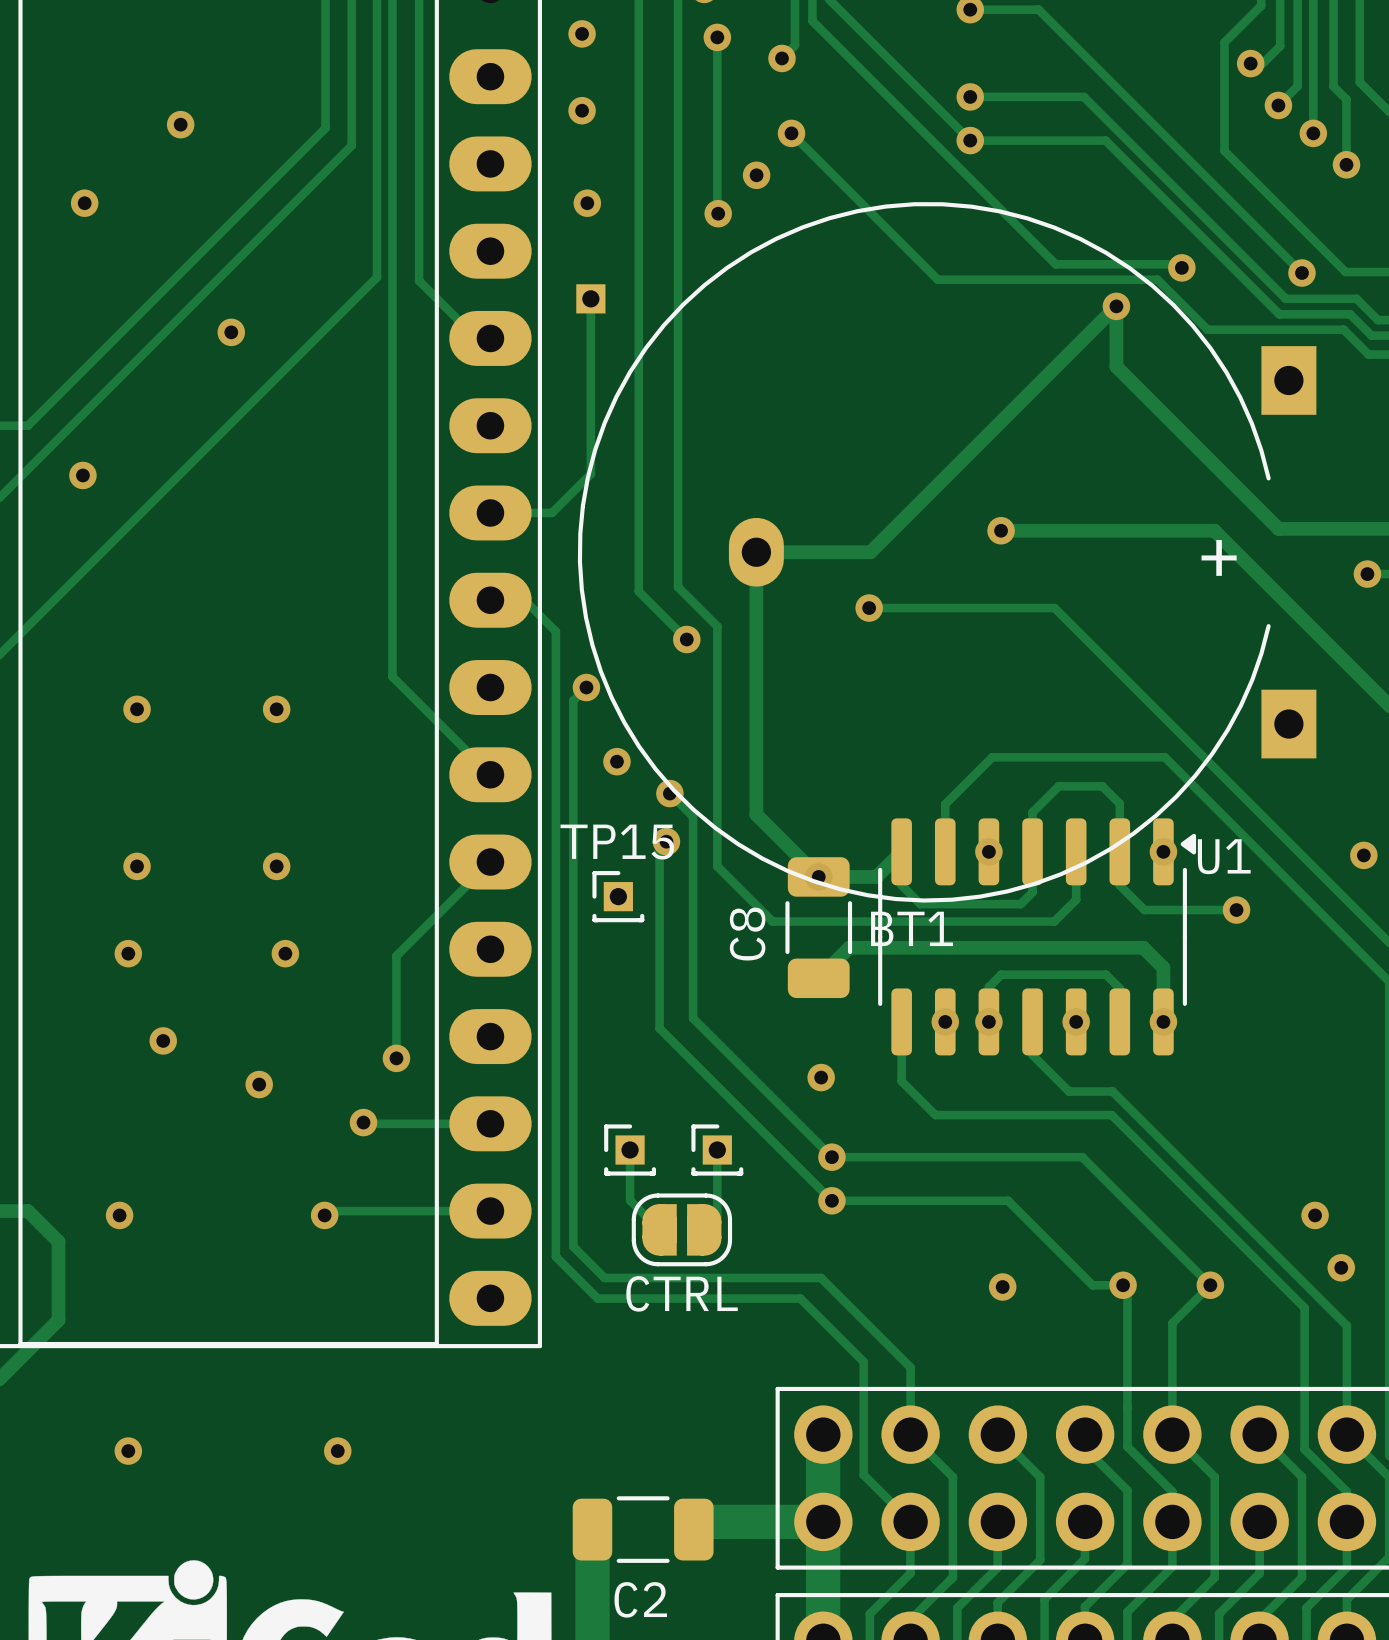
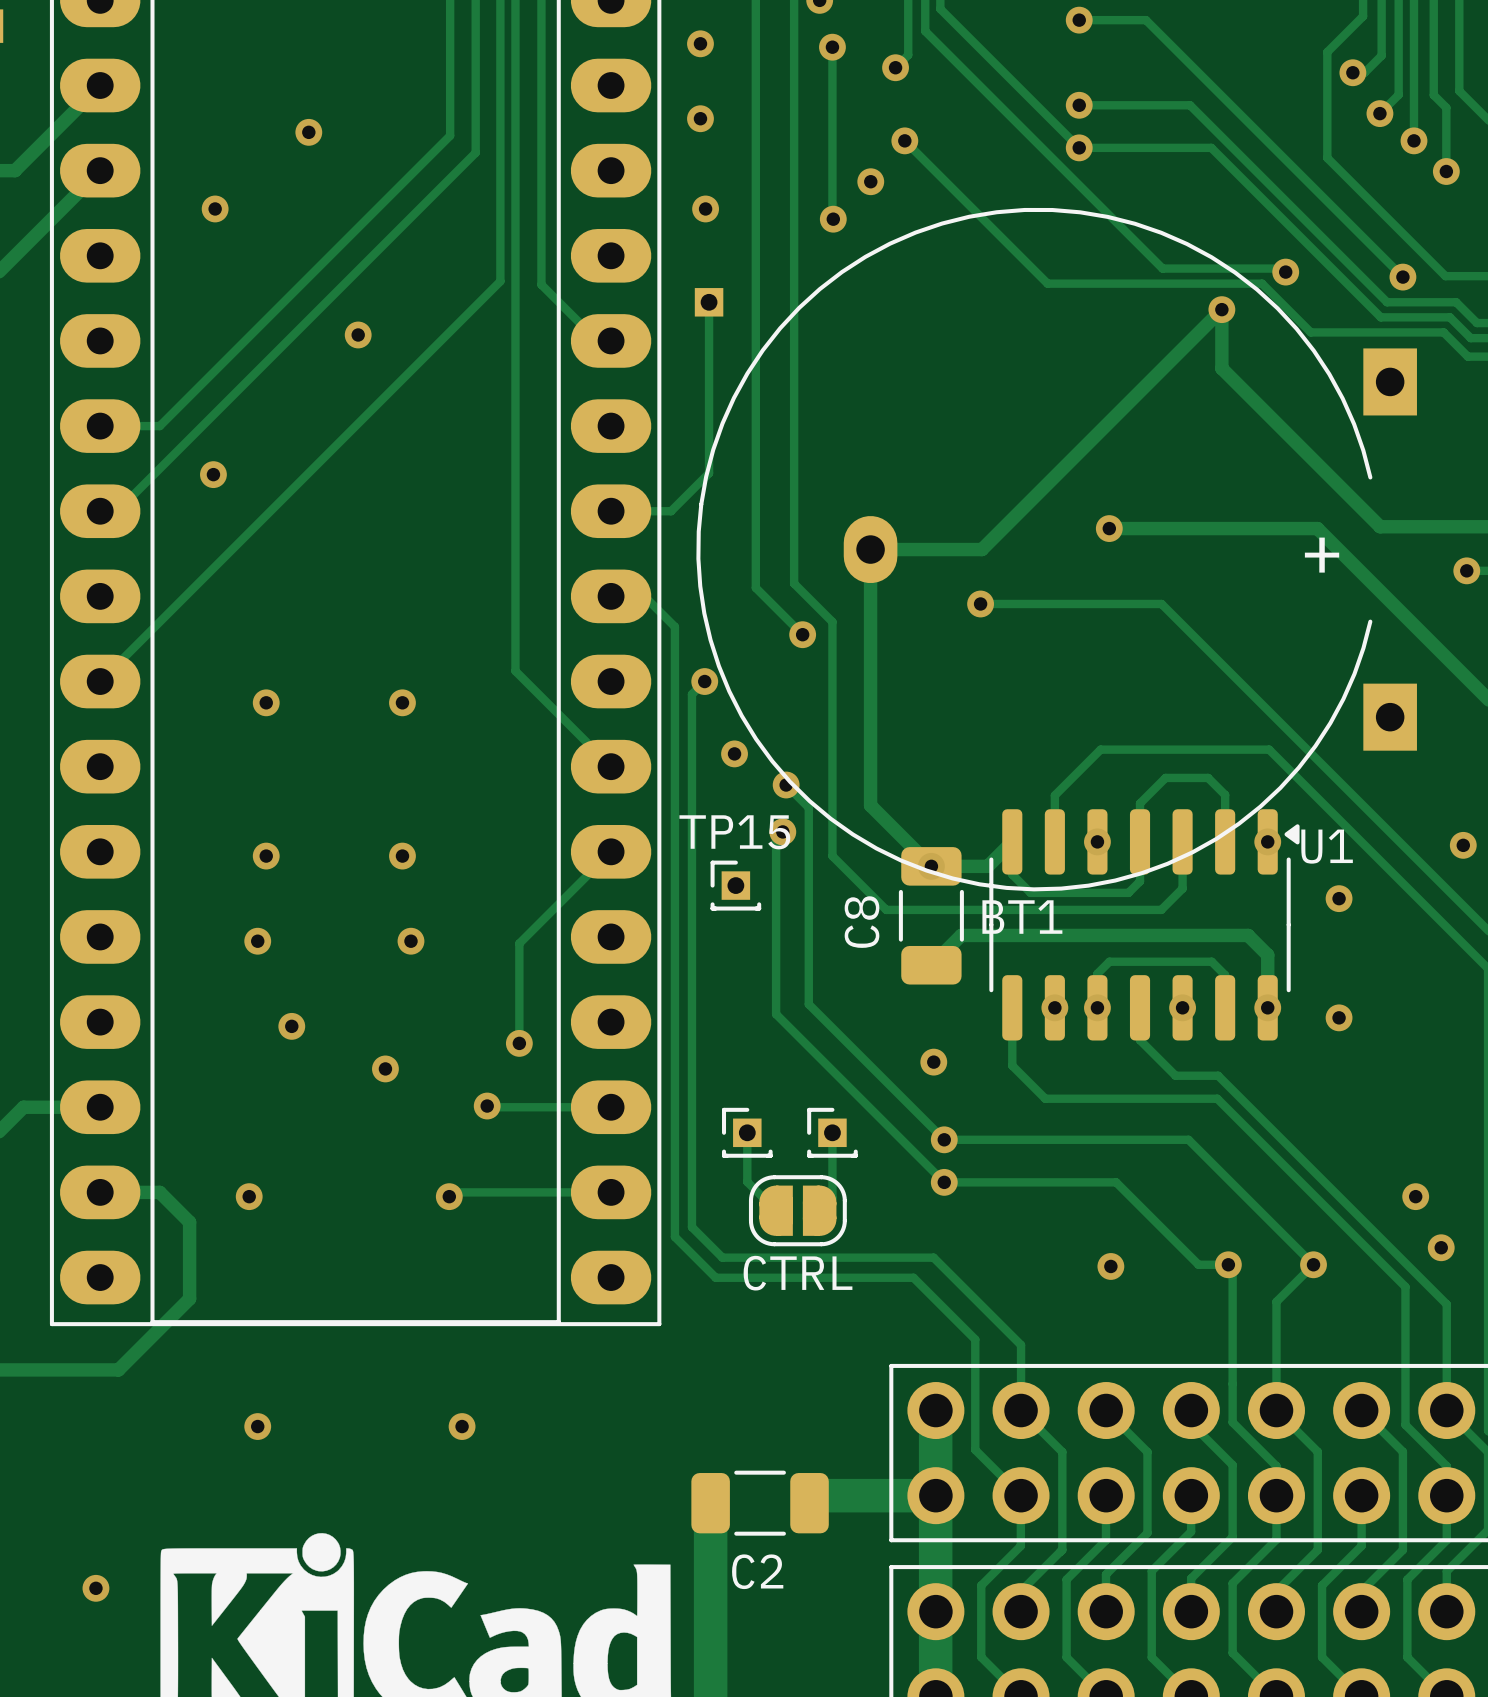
track: (1119, 851) (1119, 885) (1144, 910) (1236, 910) -> none
via: none -> (1339, 1017)

